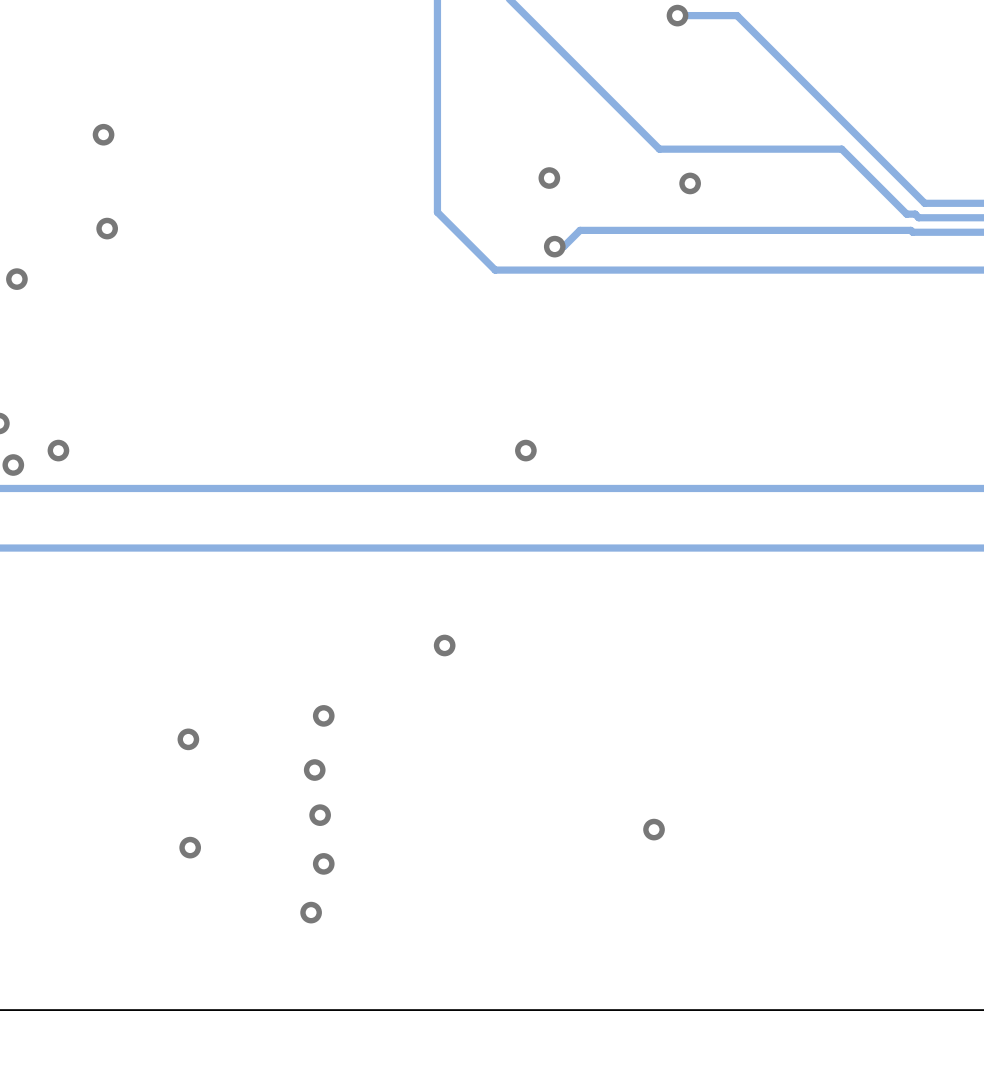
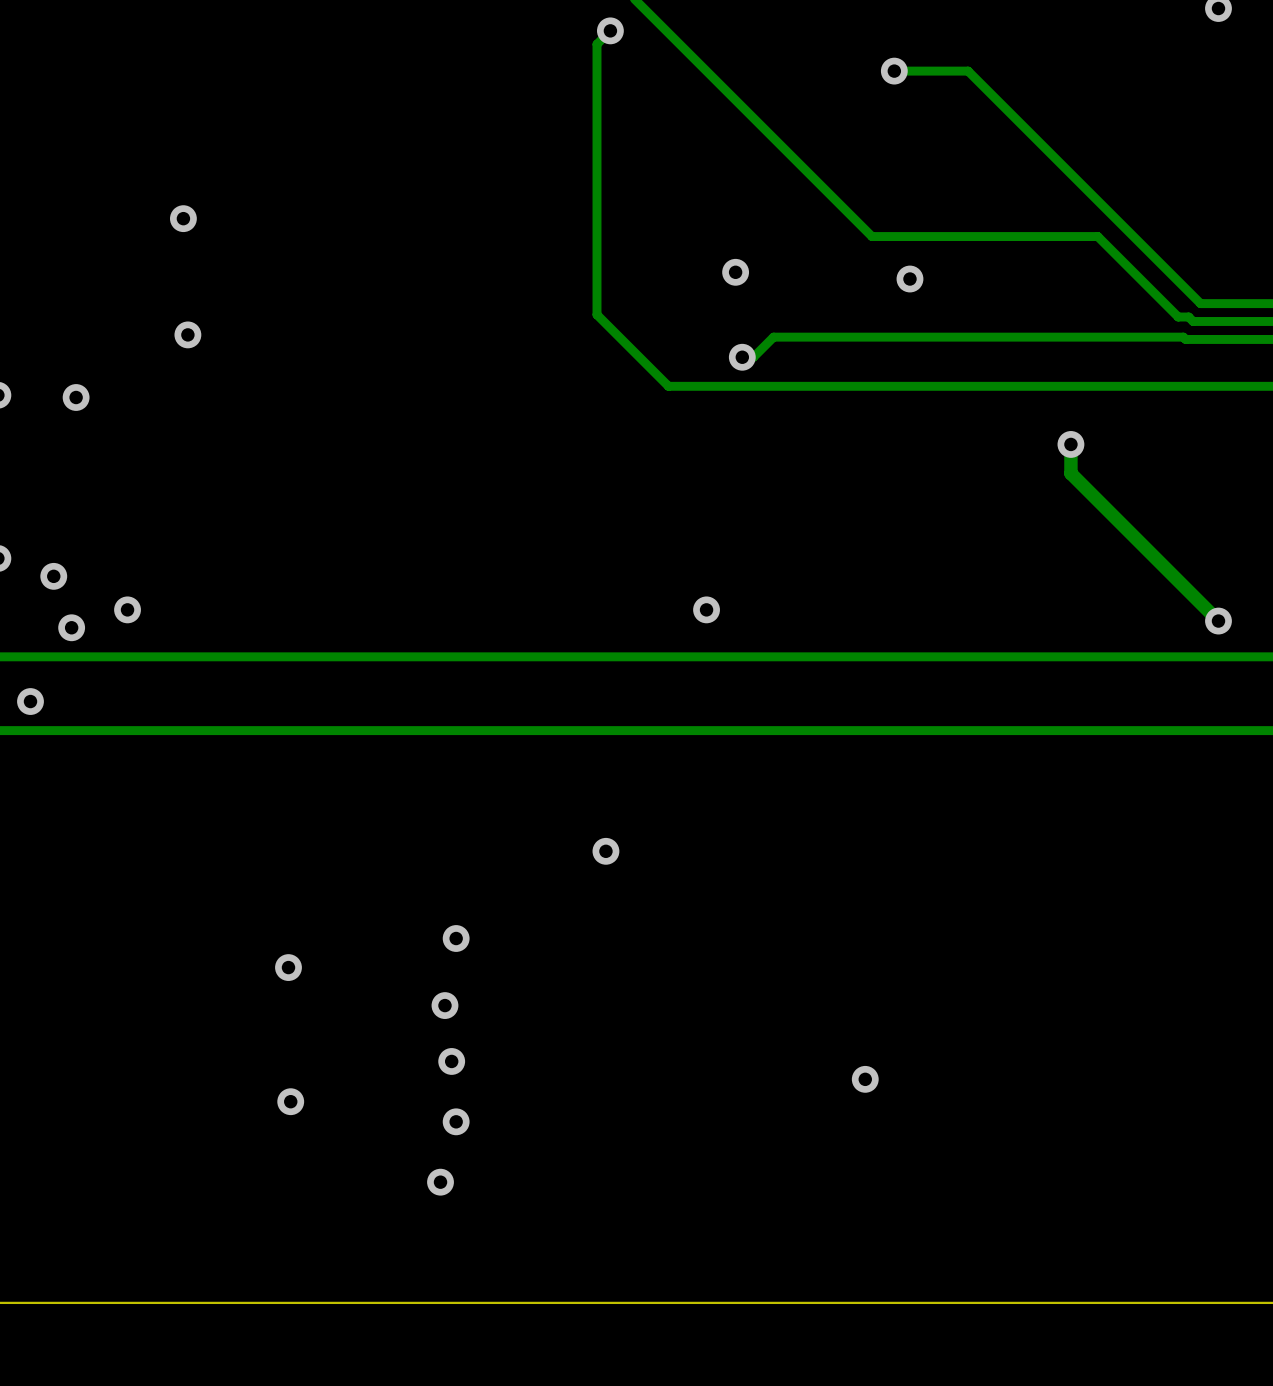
track: none -> (1070, 444) (1070, 473) (1218, 621)
via: none -> (1070, 444)
via: none -> (1218, 621)

